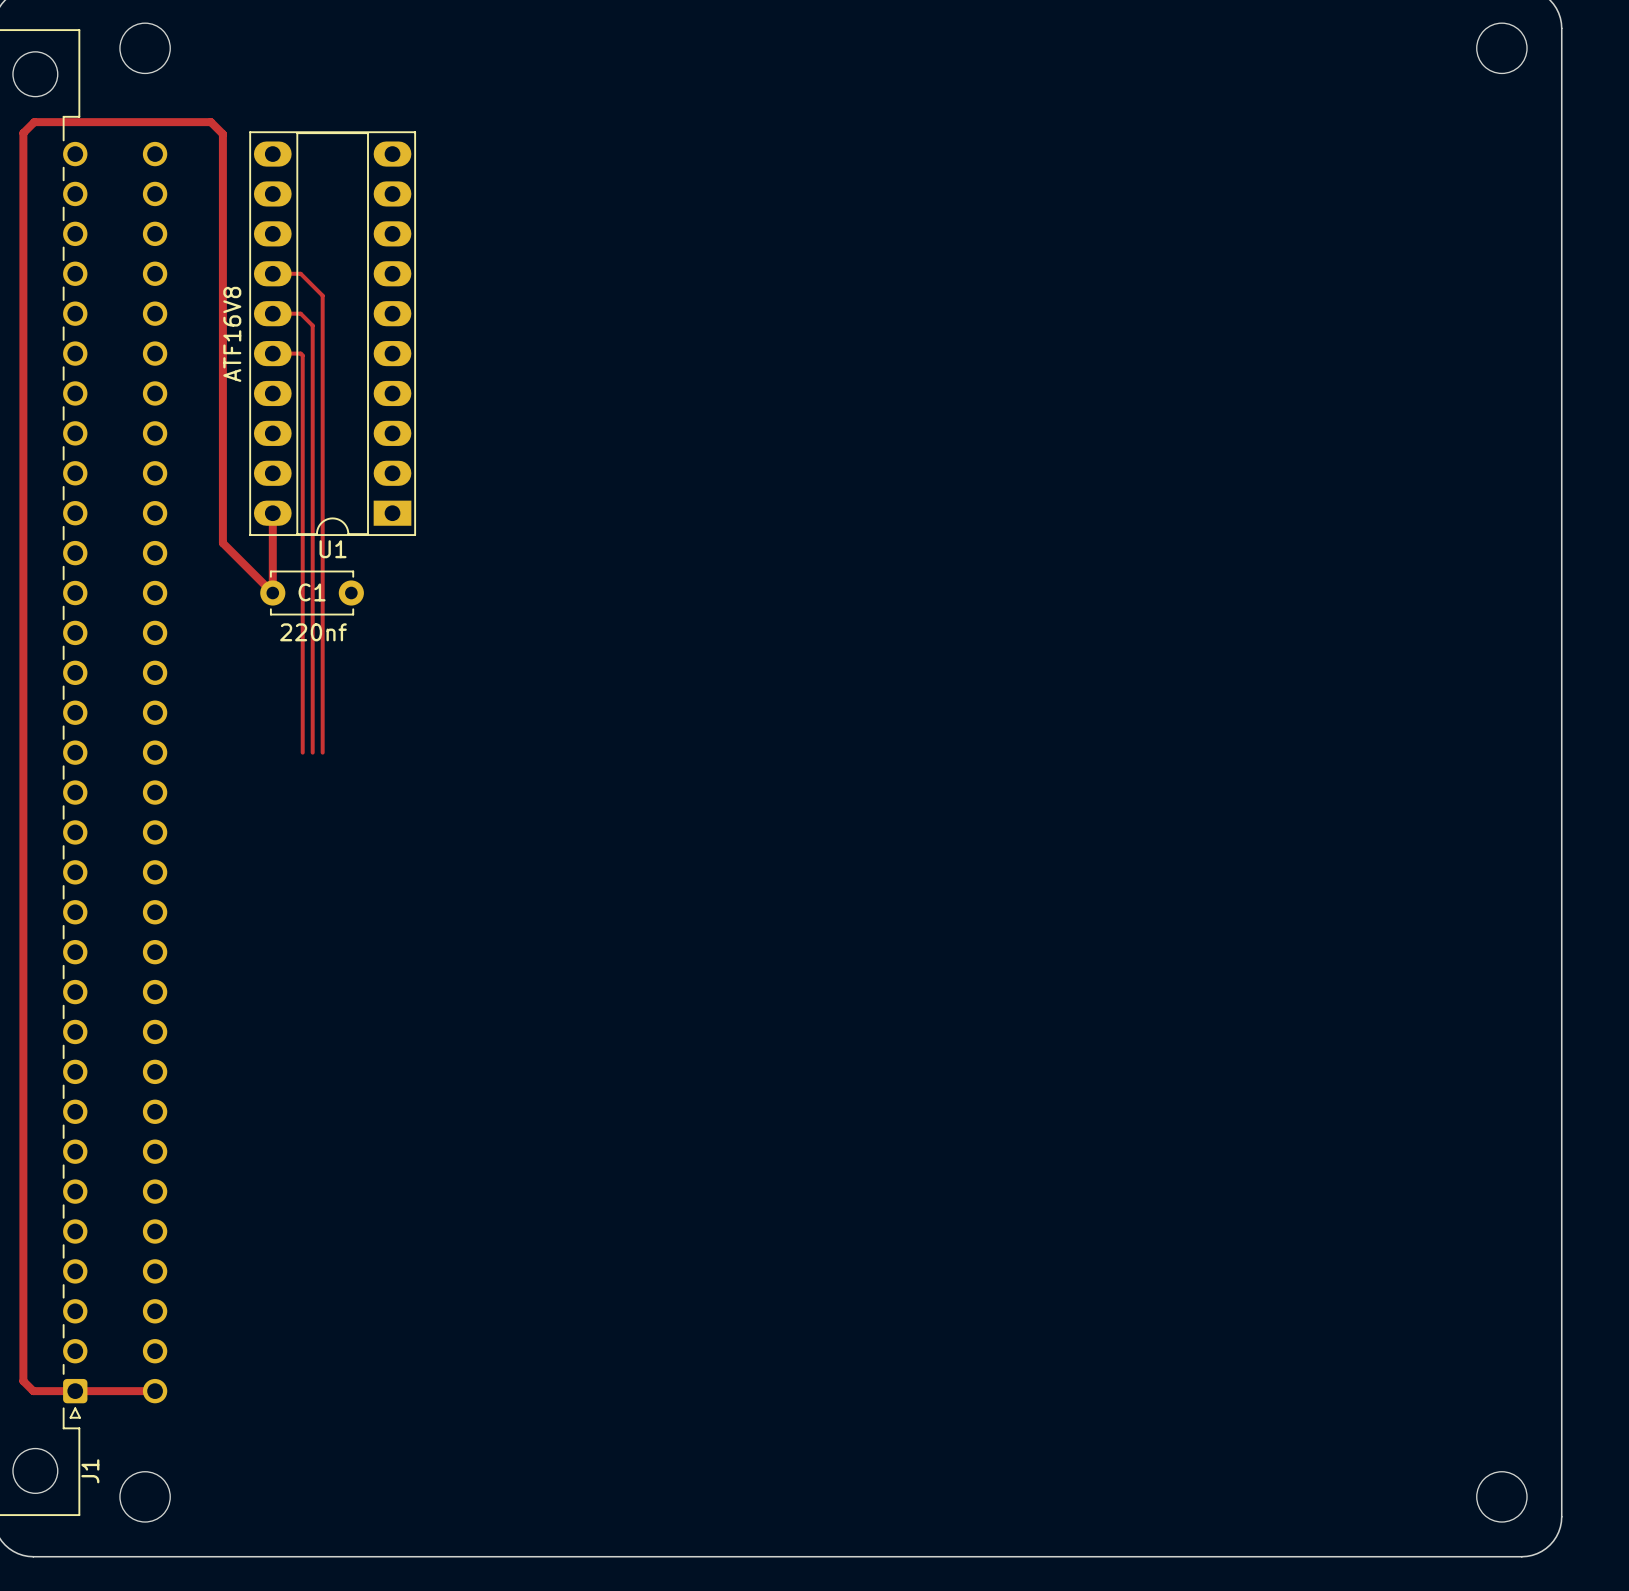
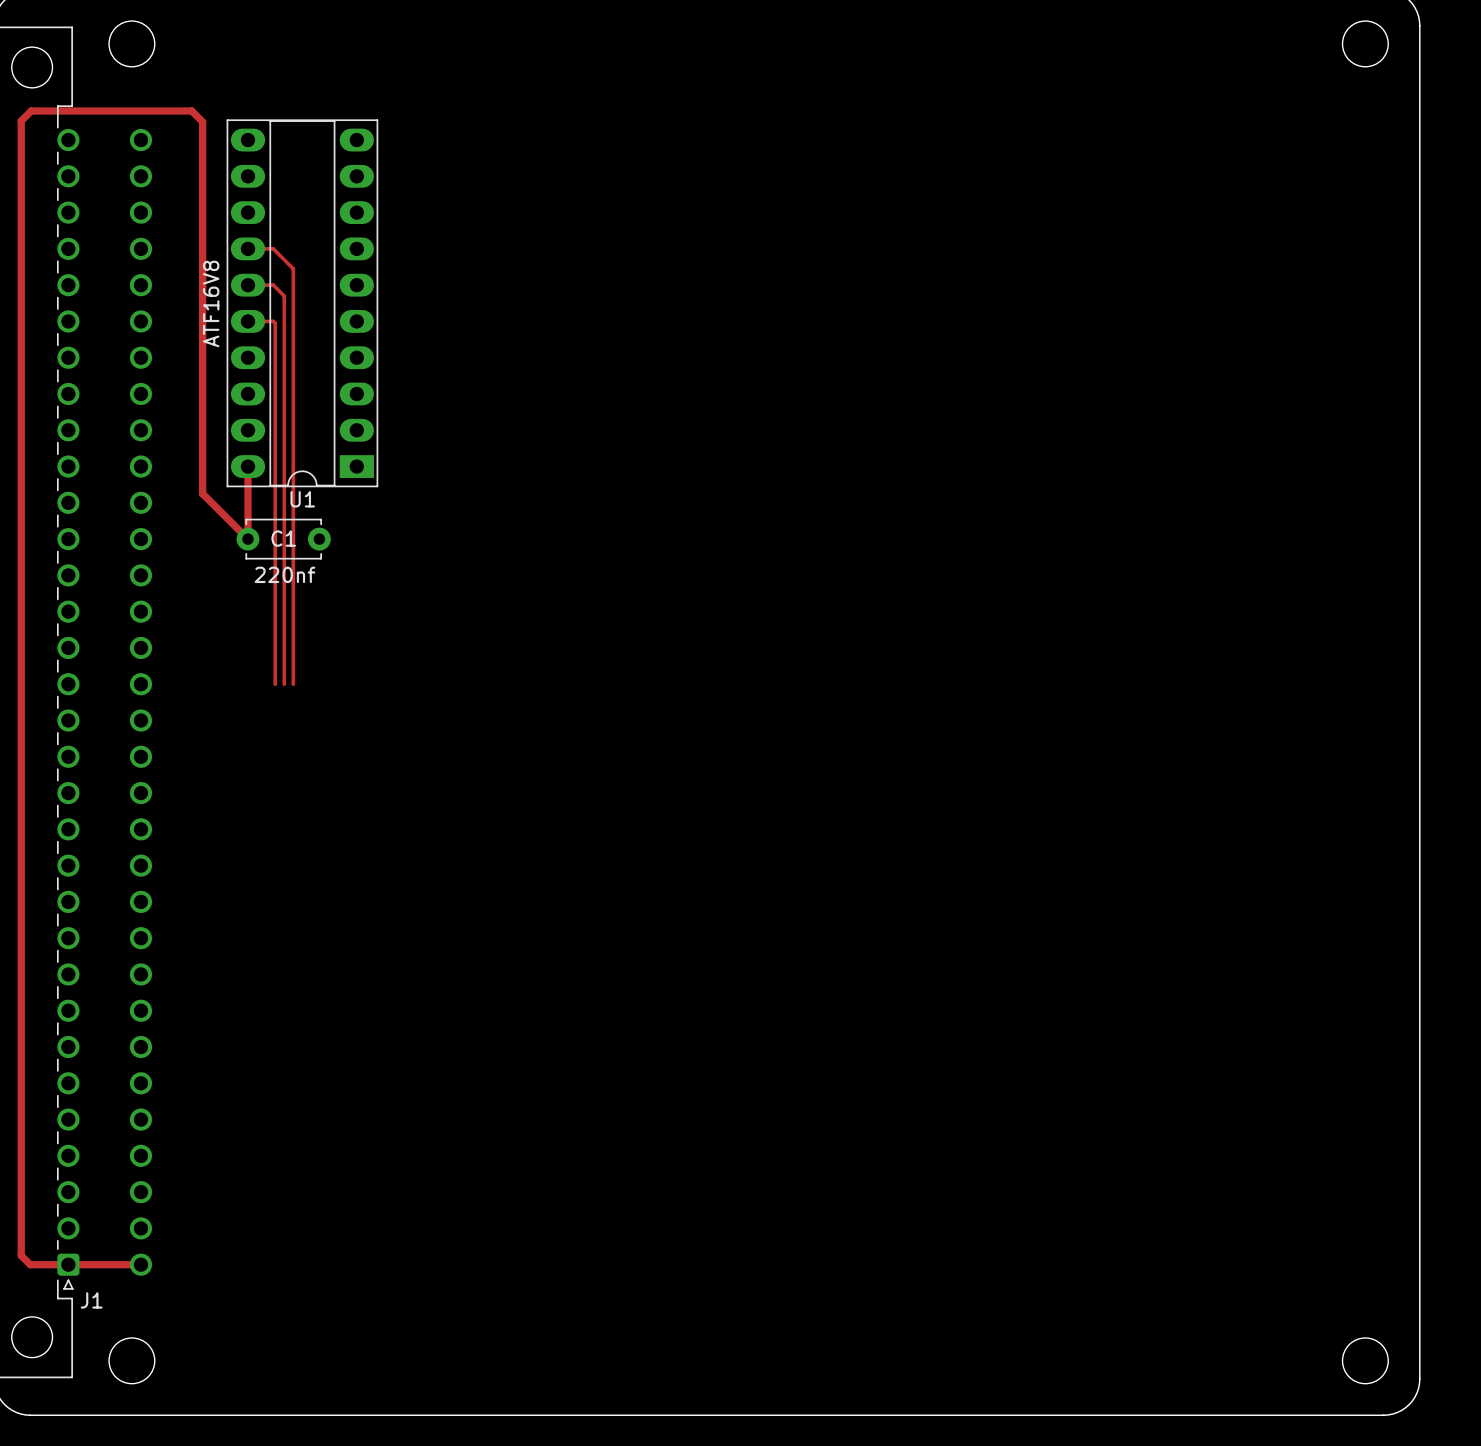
J1 name rotation: 0° (90, 1471) -> 90° clockwise (91, 1300)
J1 name position: J1 (90, 1471) -> J1 (91, 1300)

